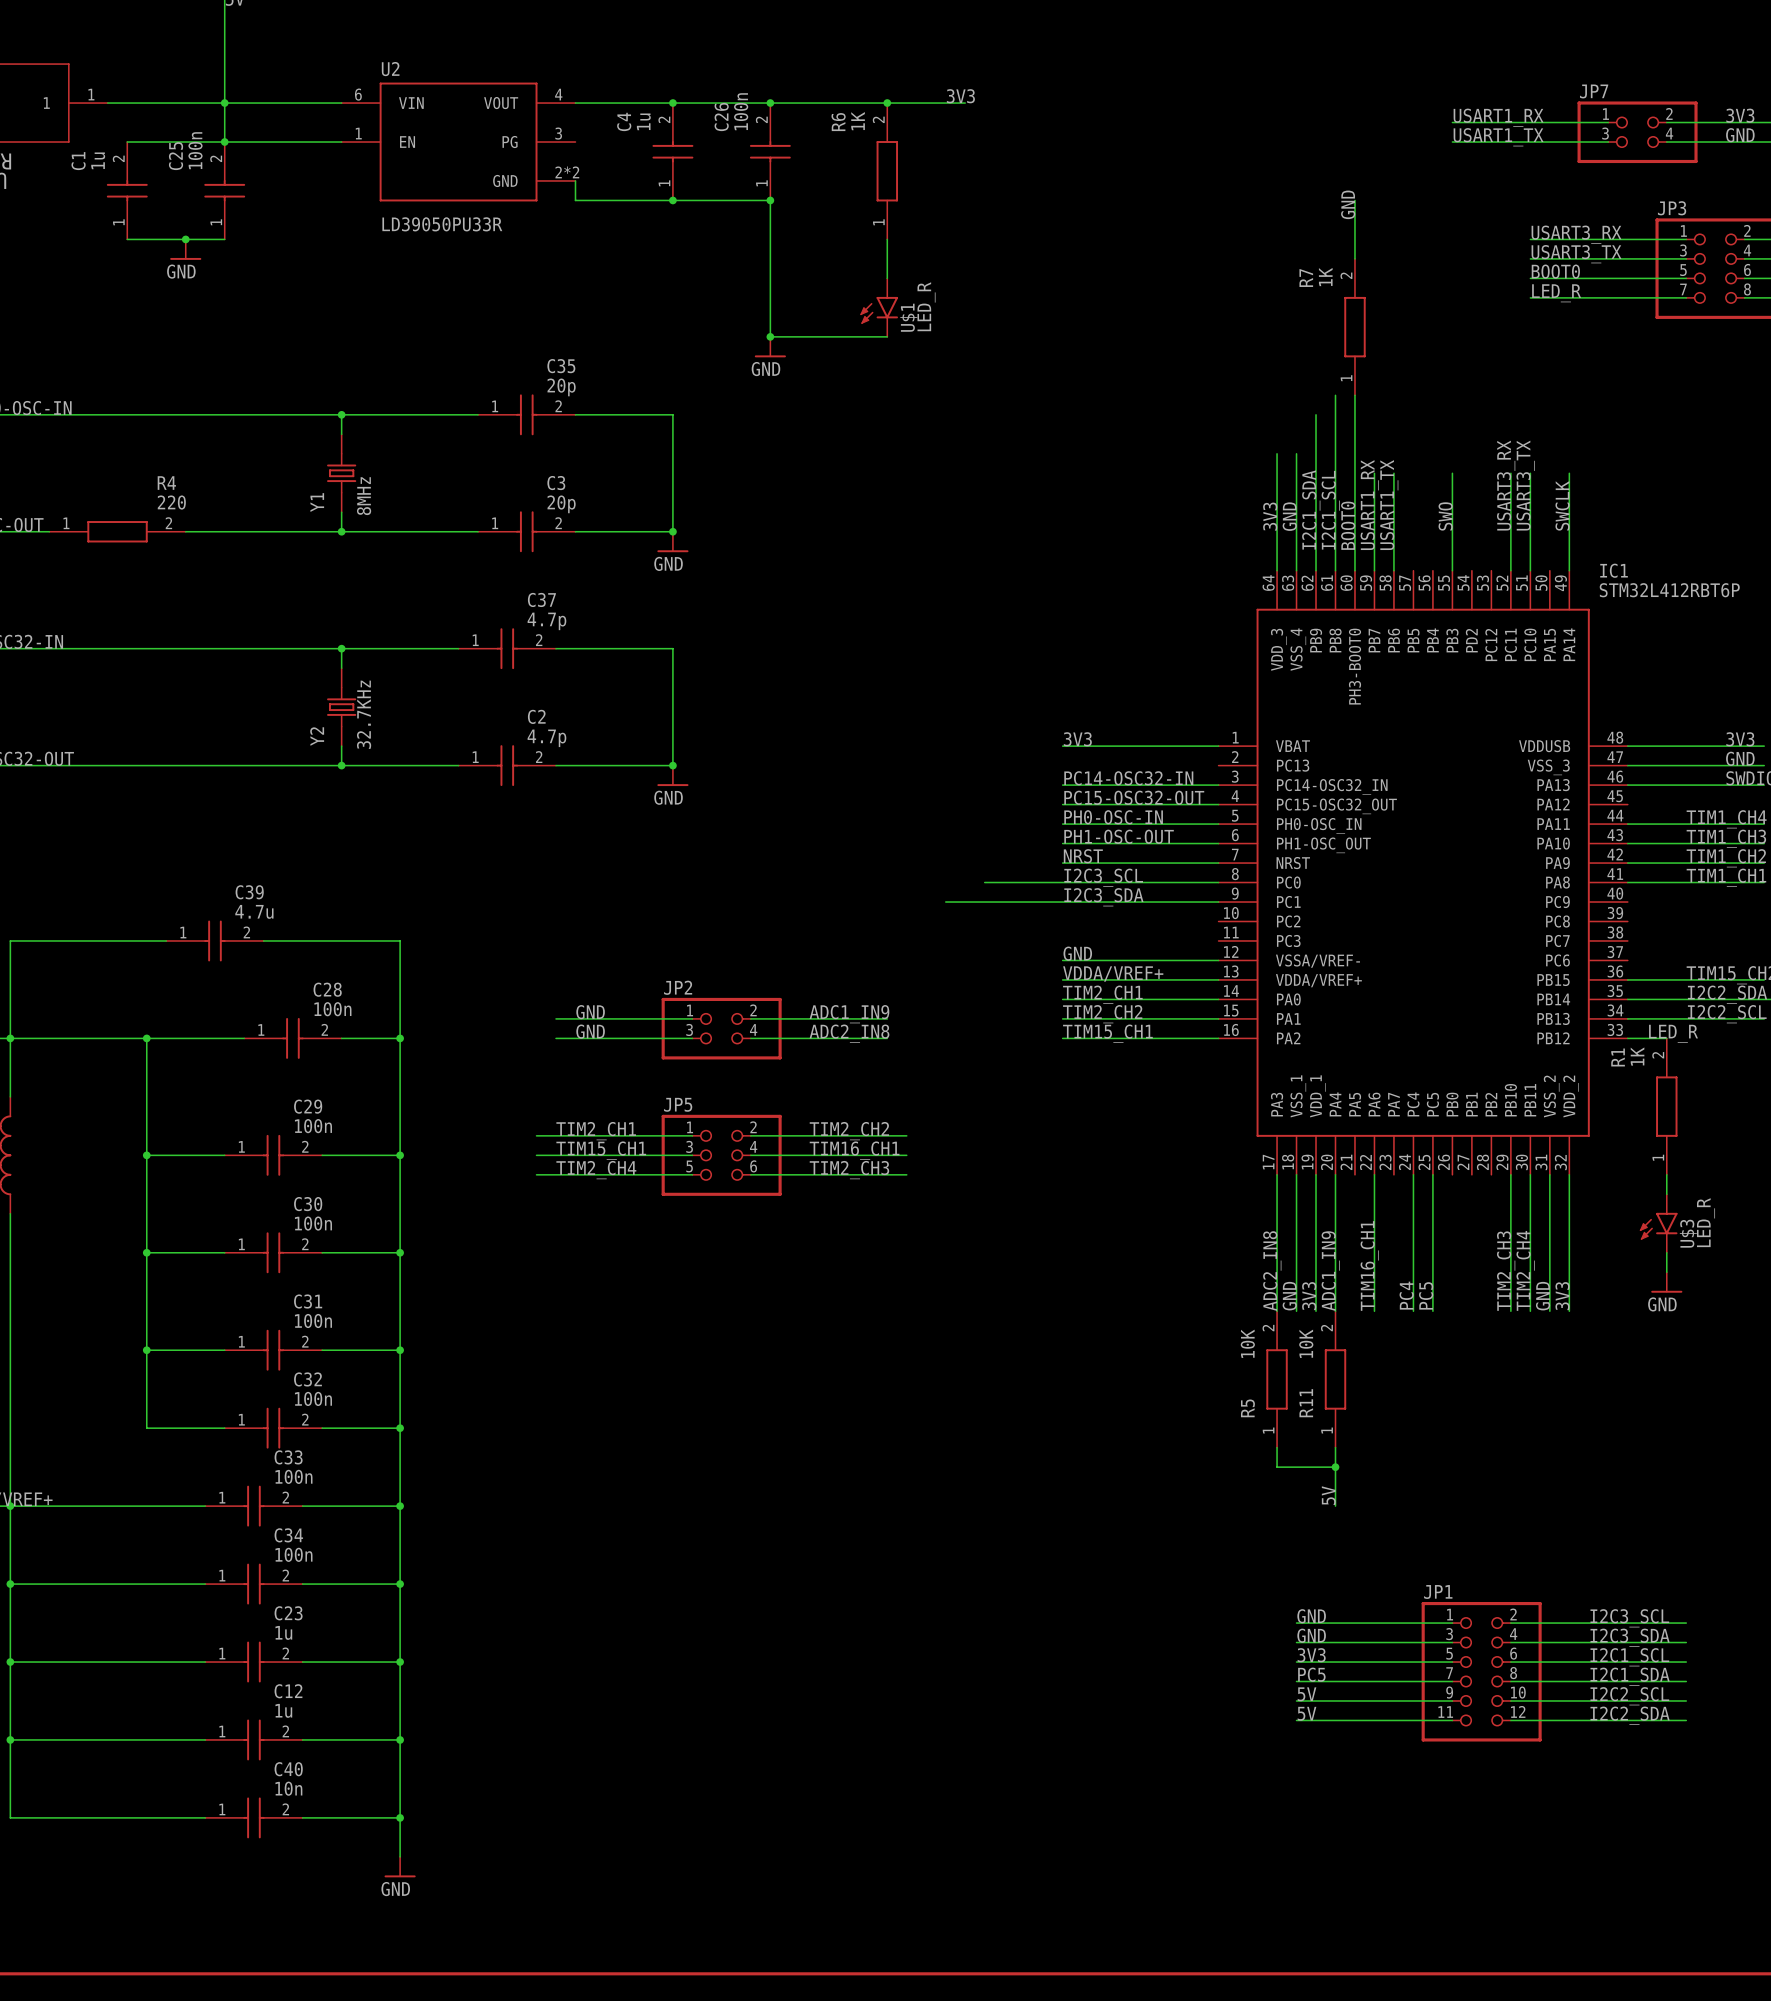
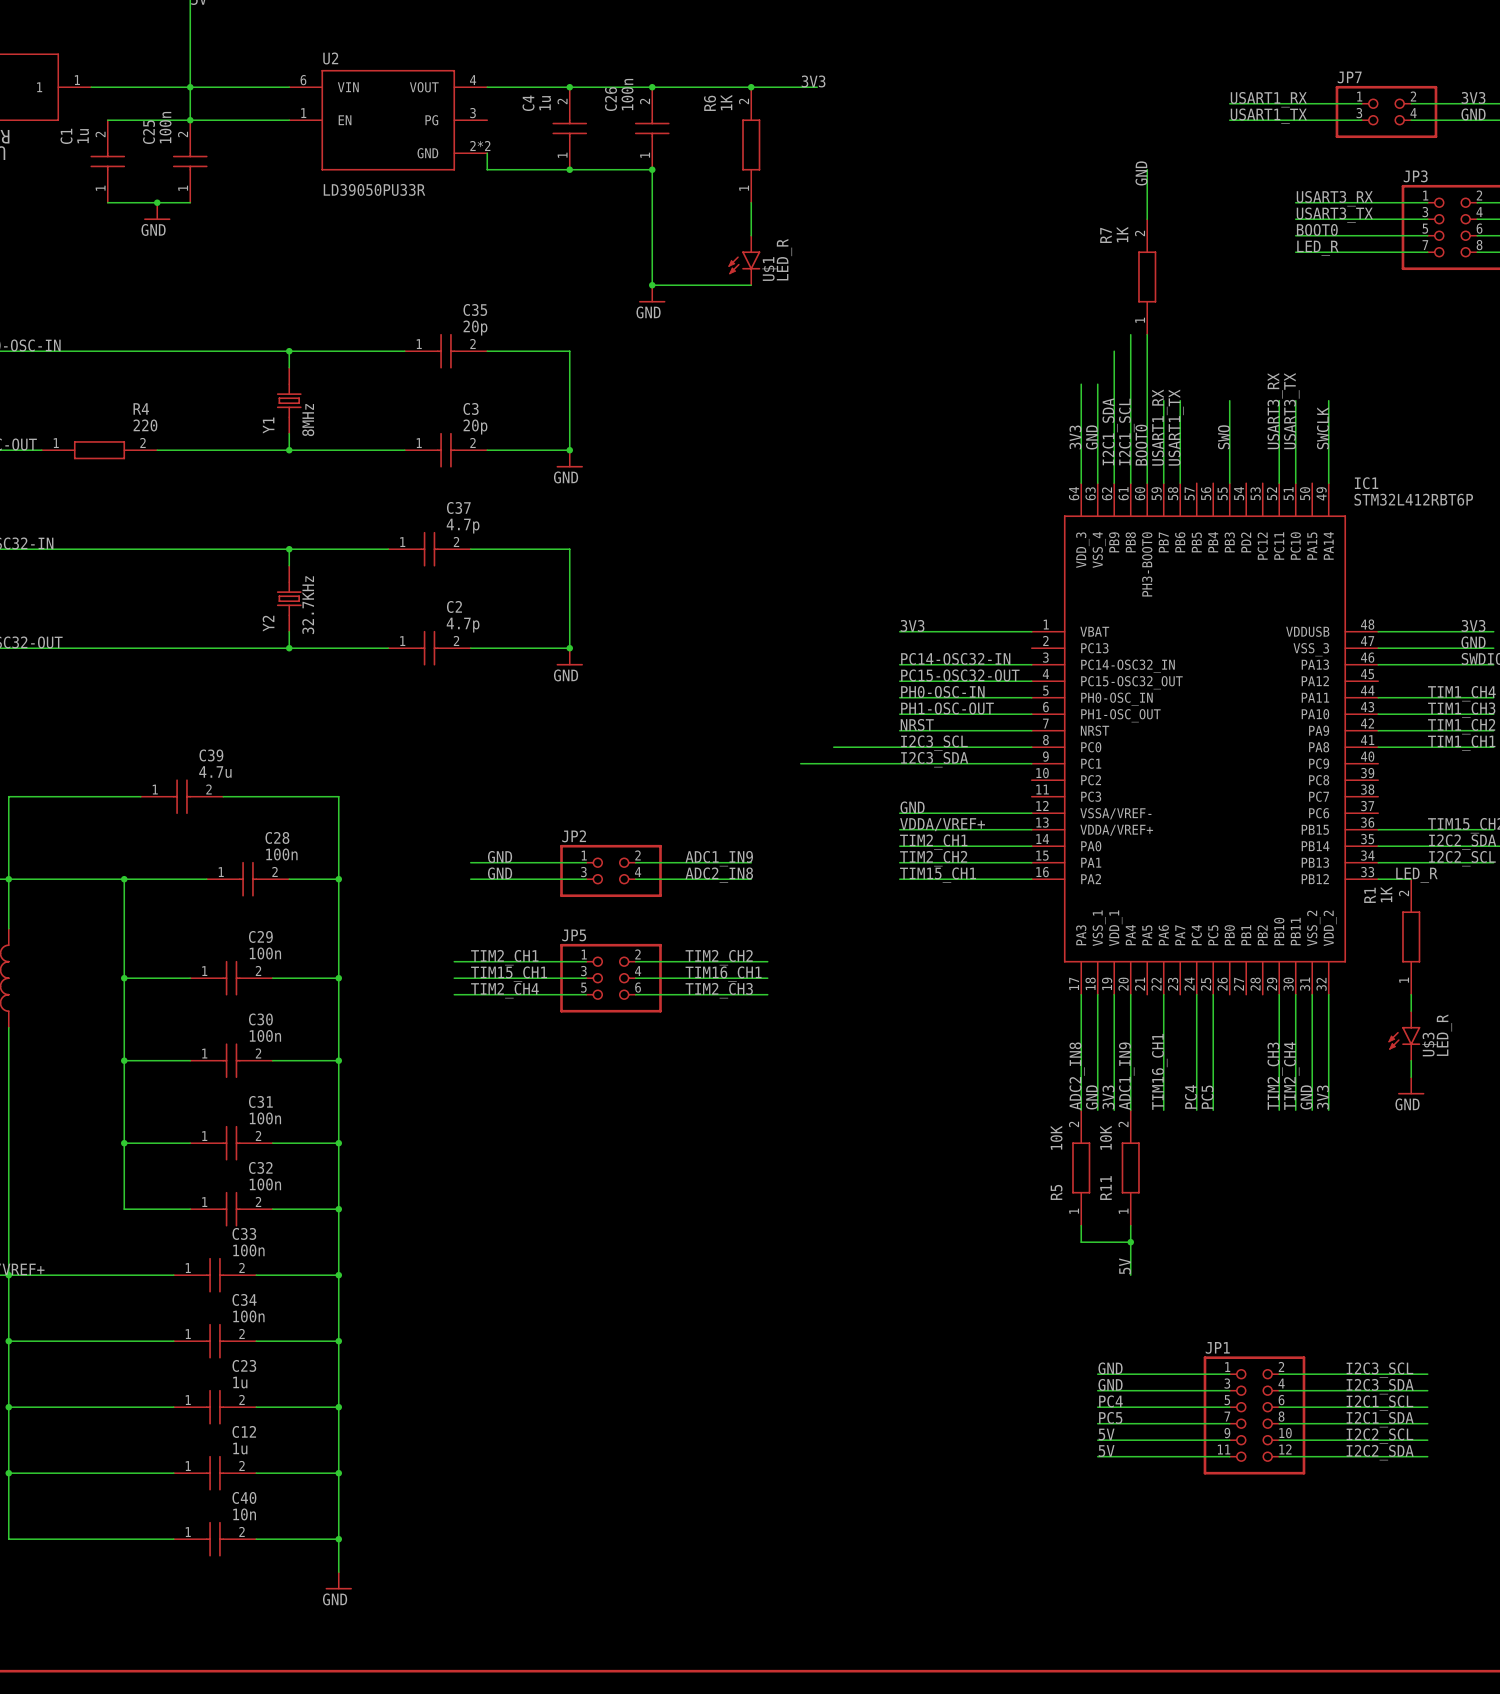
label: 3V3 (1311, 1655) -> PC4 (1110, 1401)

